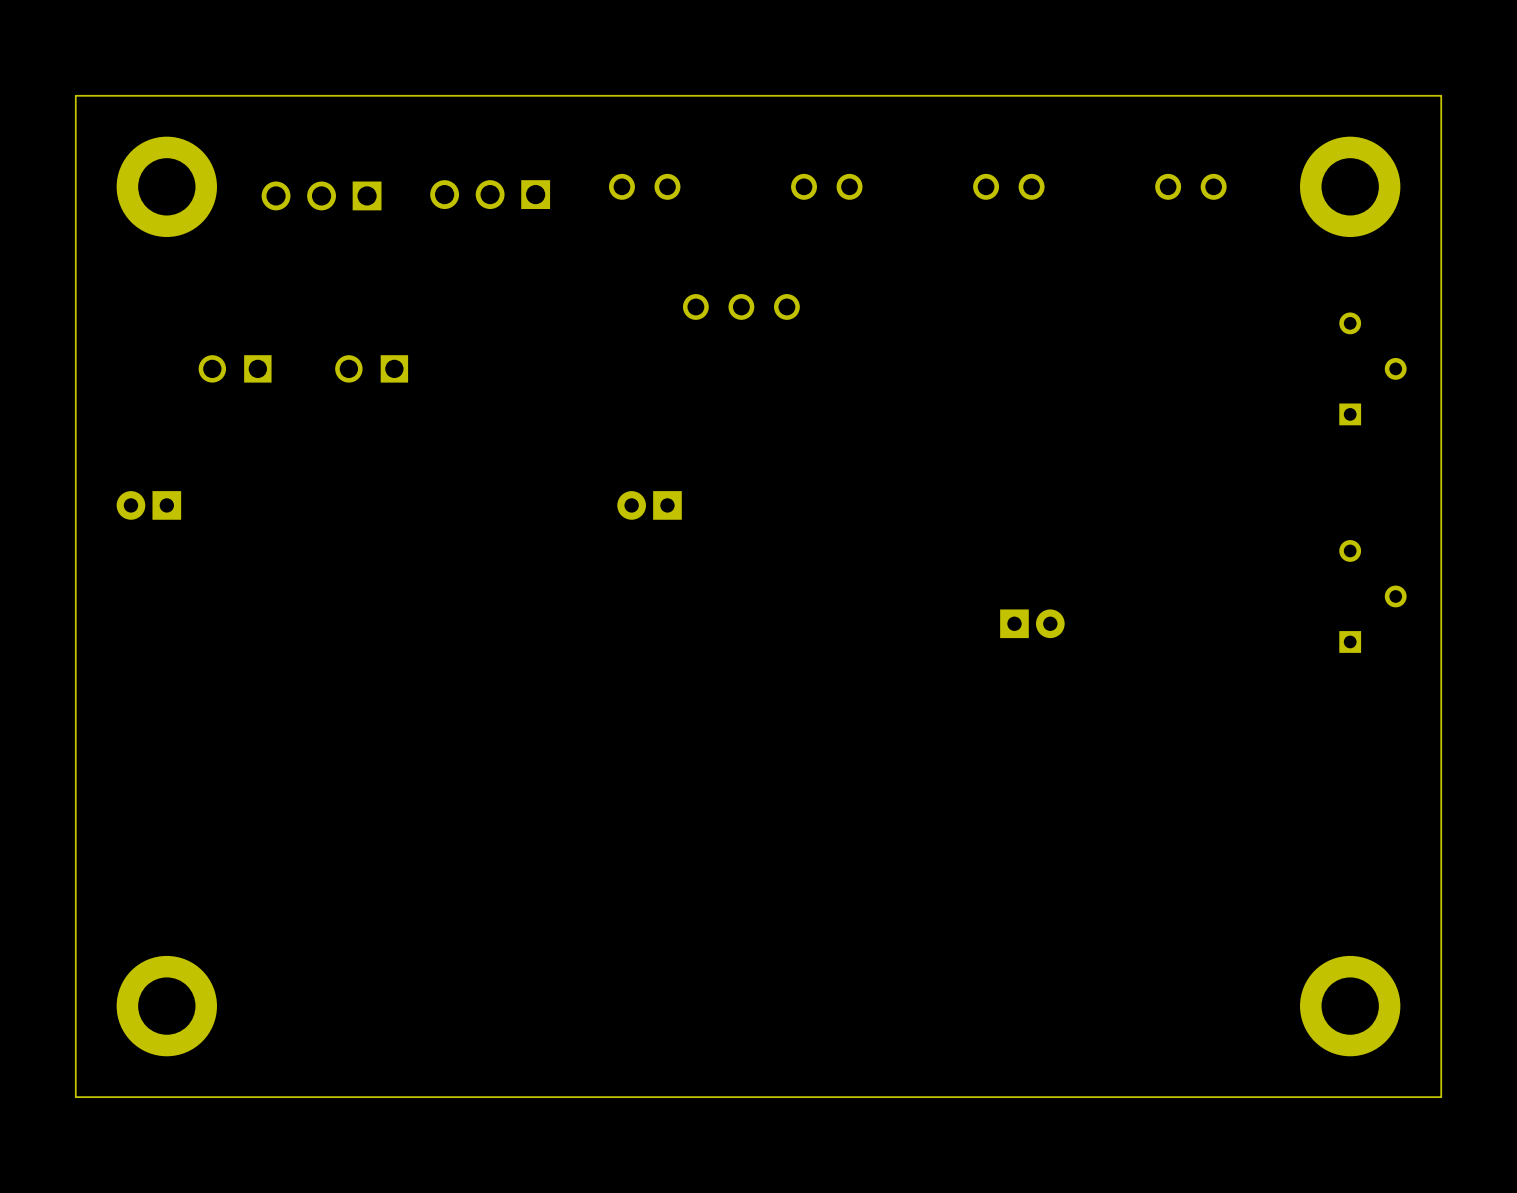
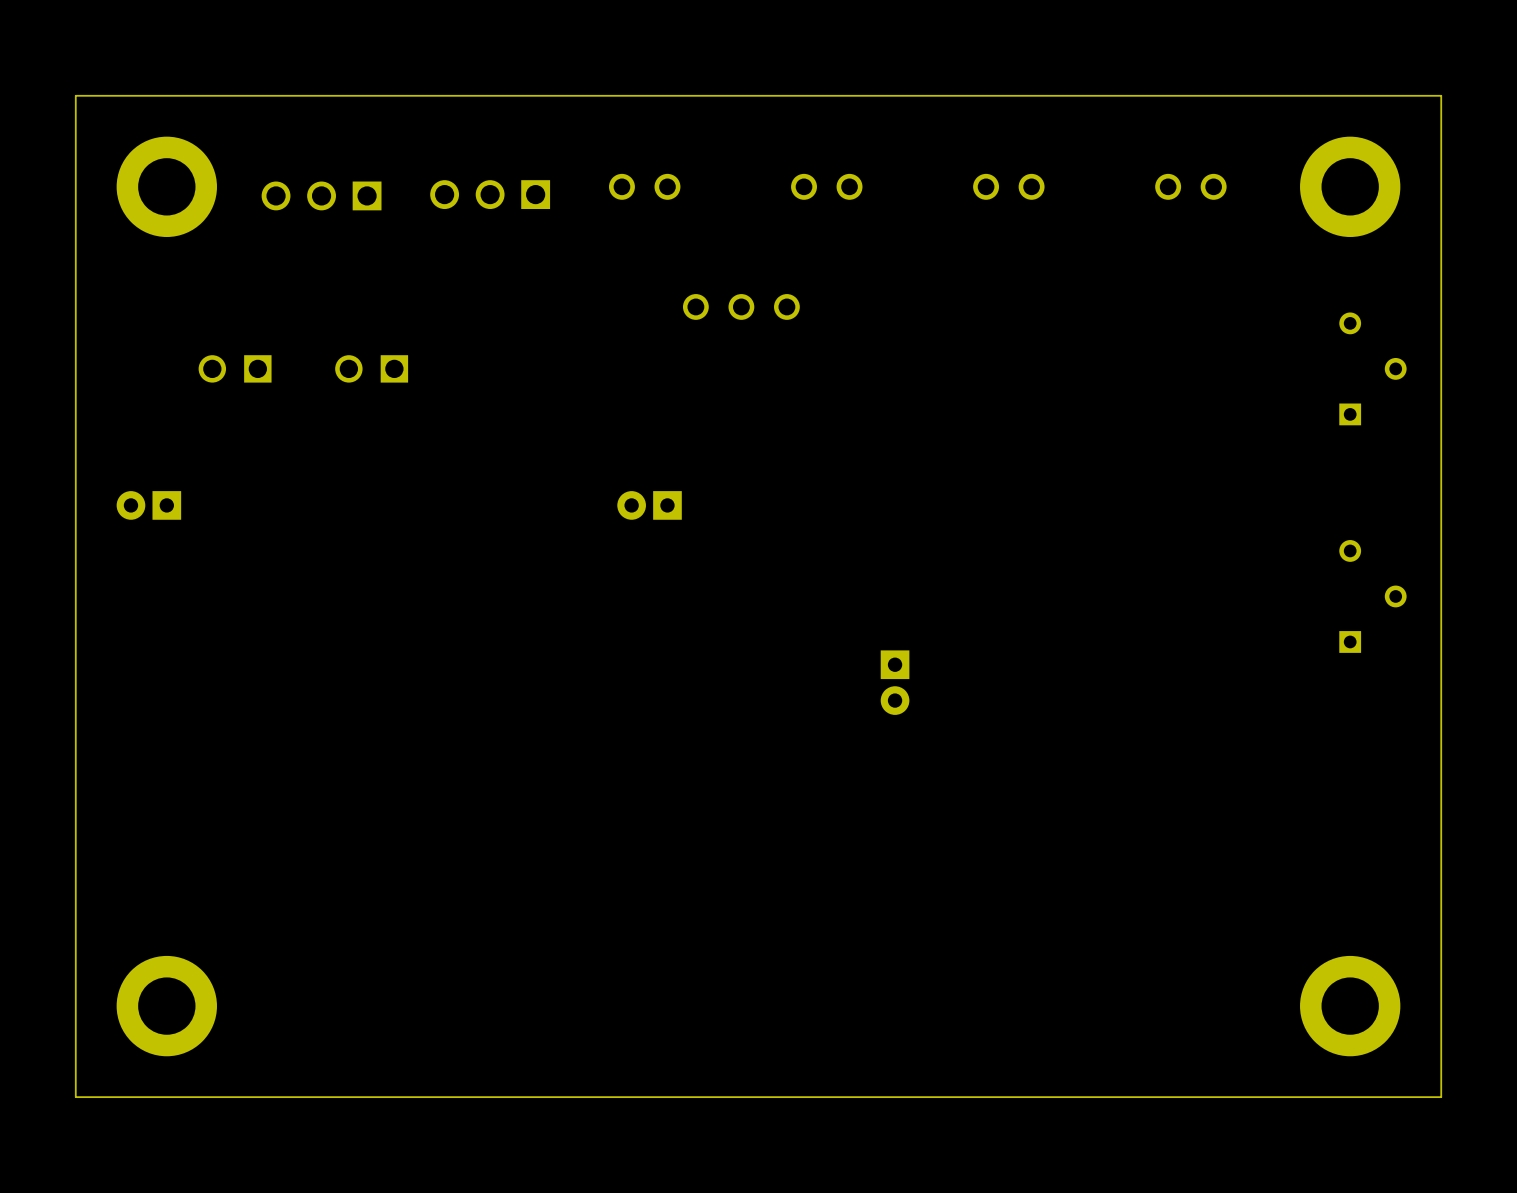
part rotation: 0° (1032, 623) -> 90° clockwise (895, 682)
part position: (1032, 623) -> (895, 682)

